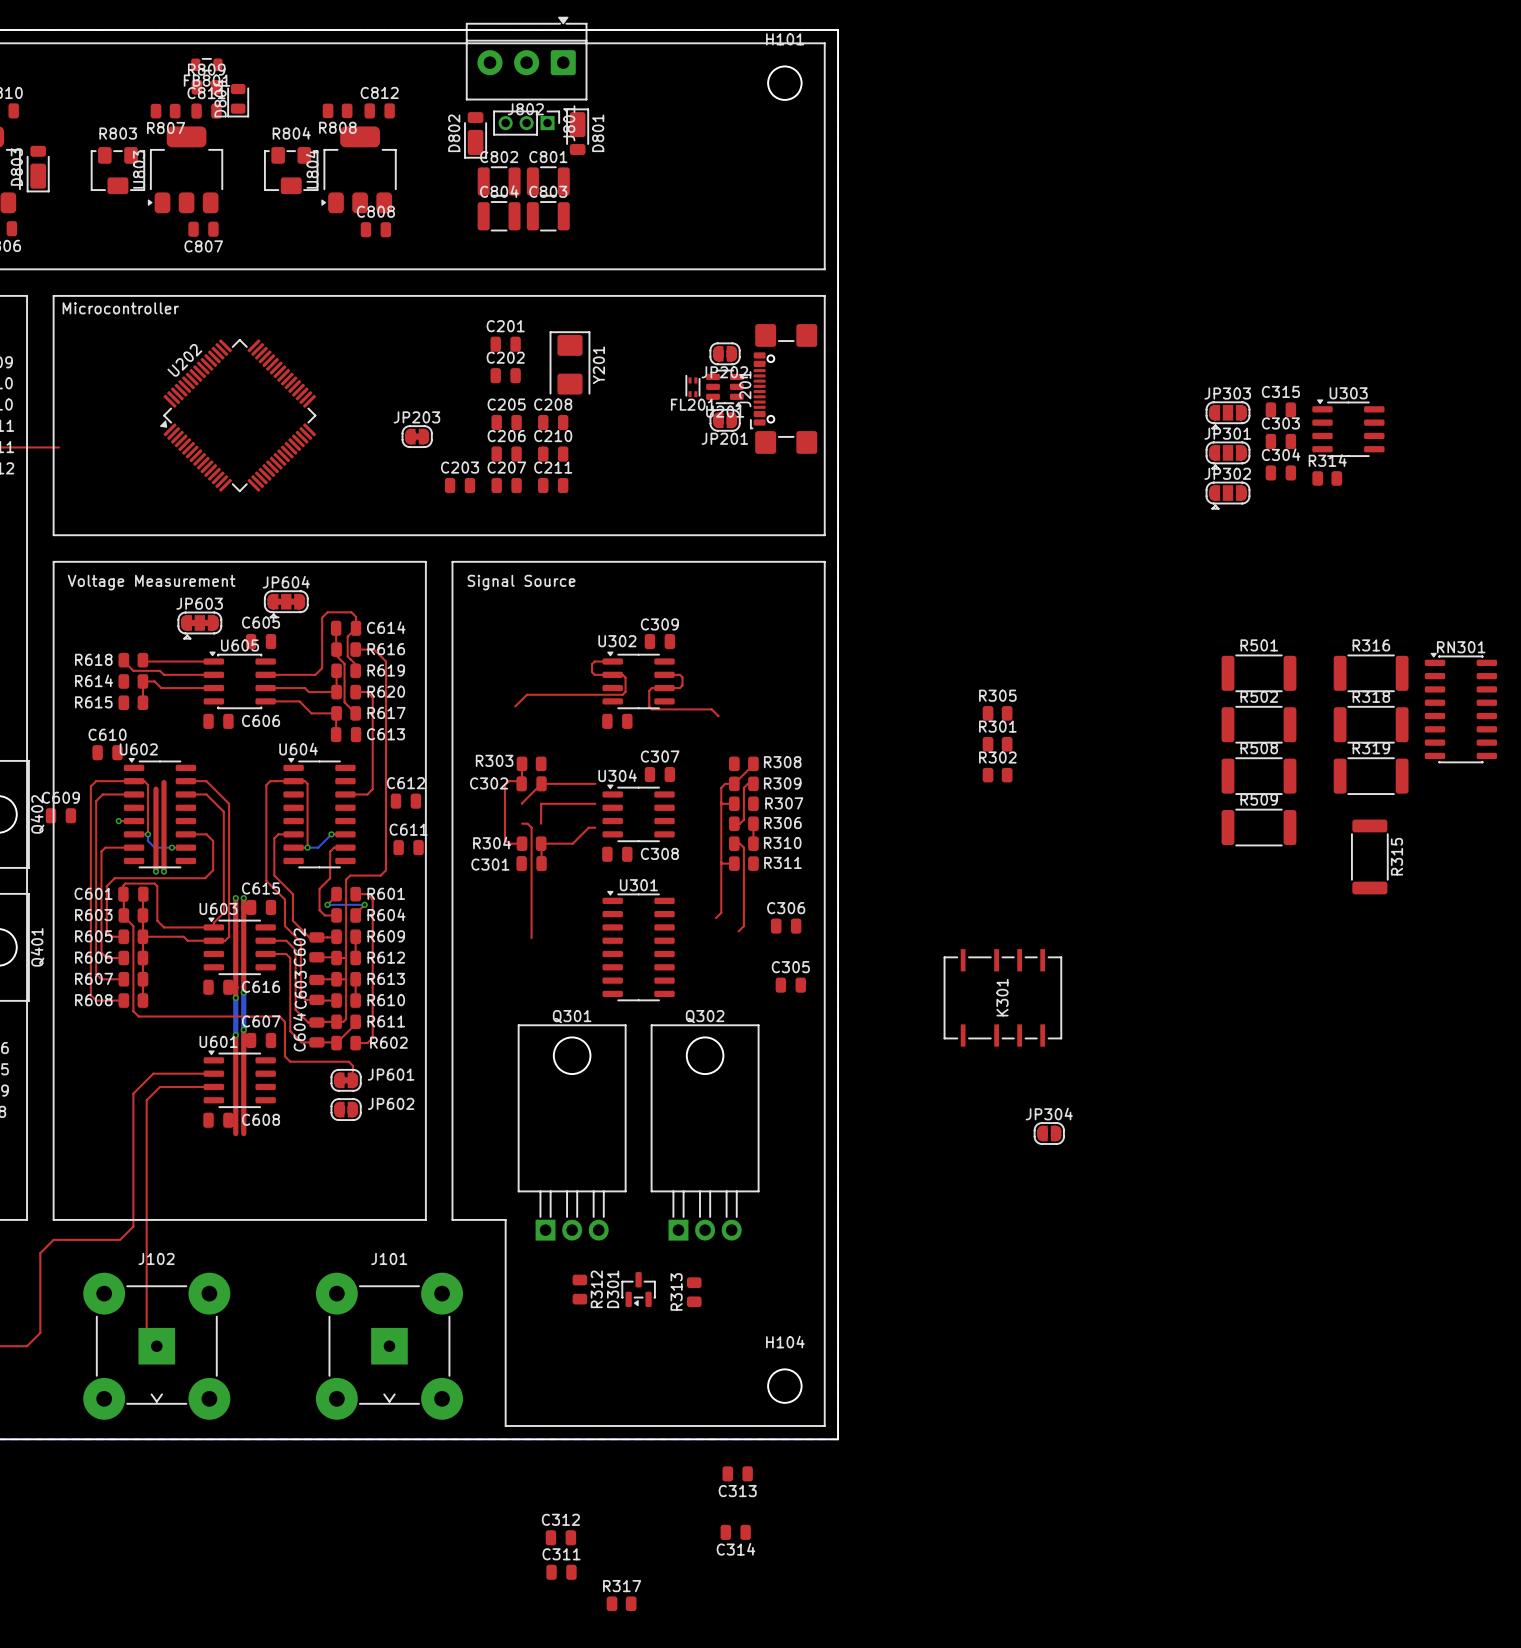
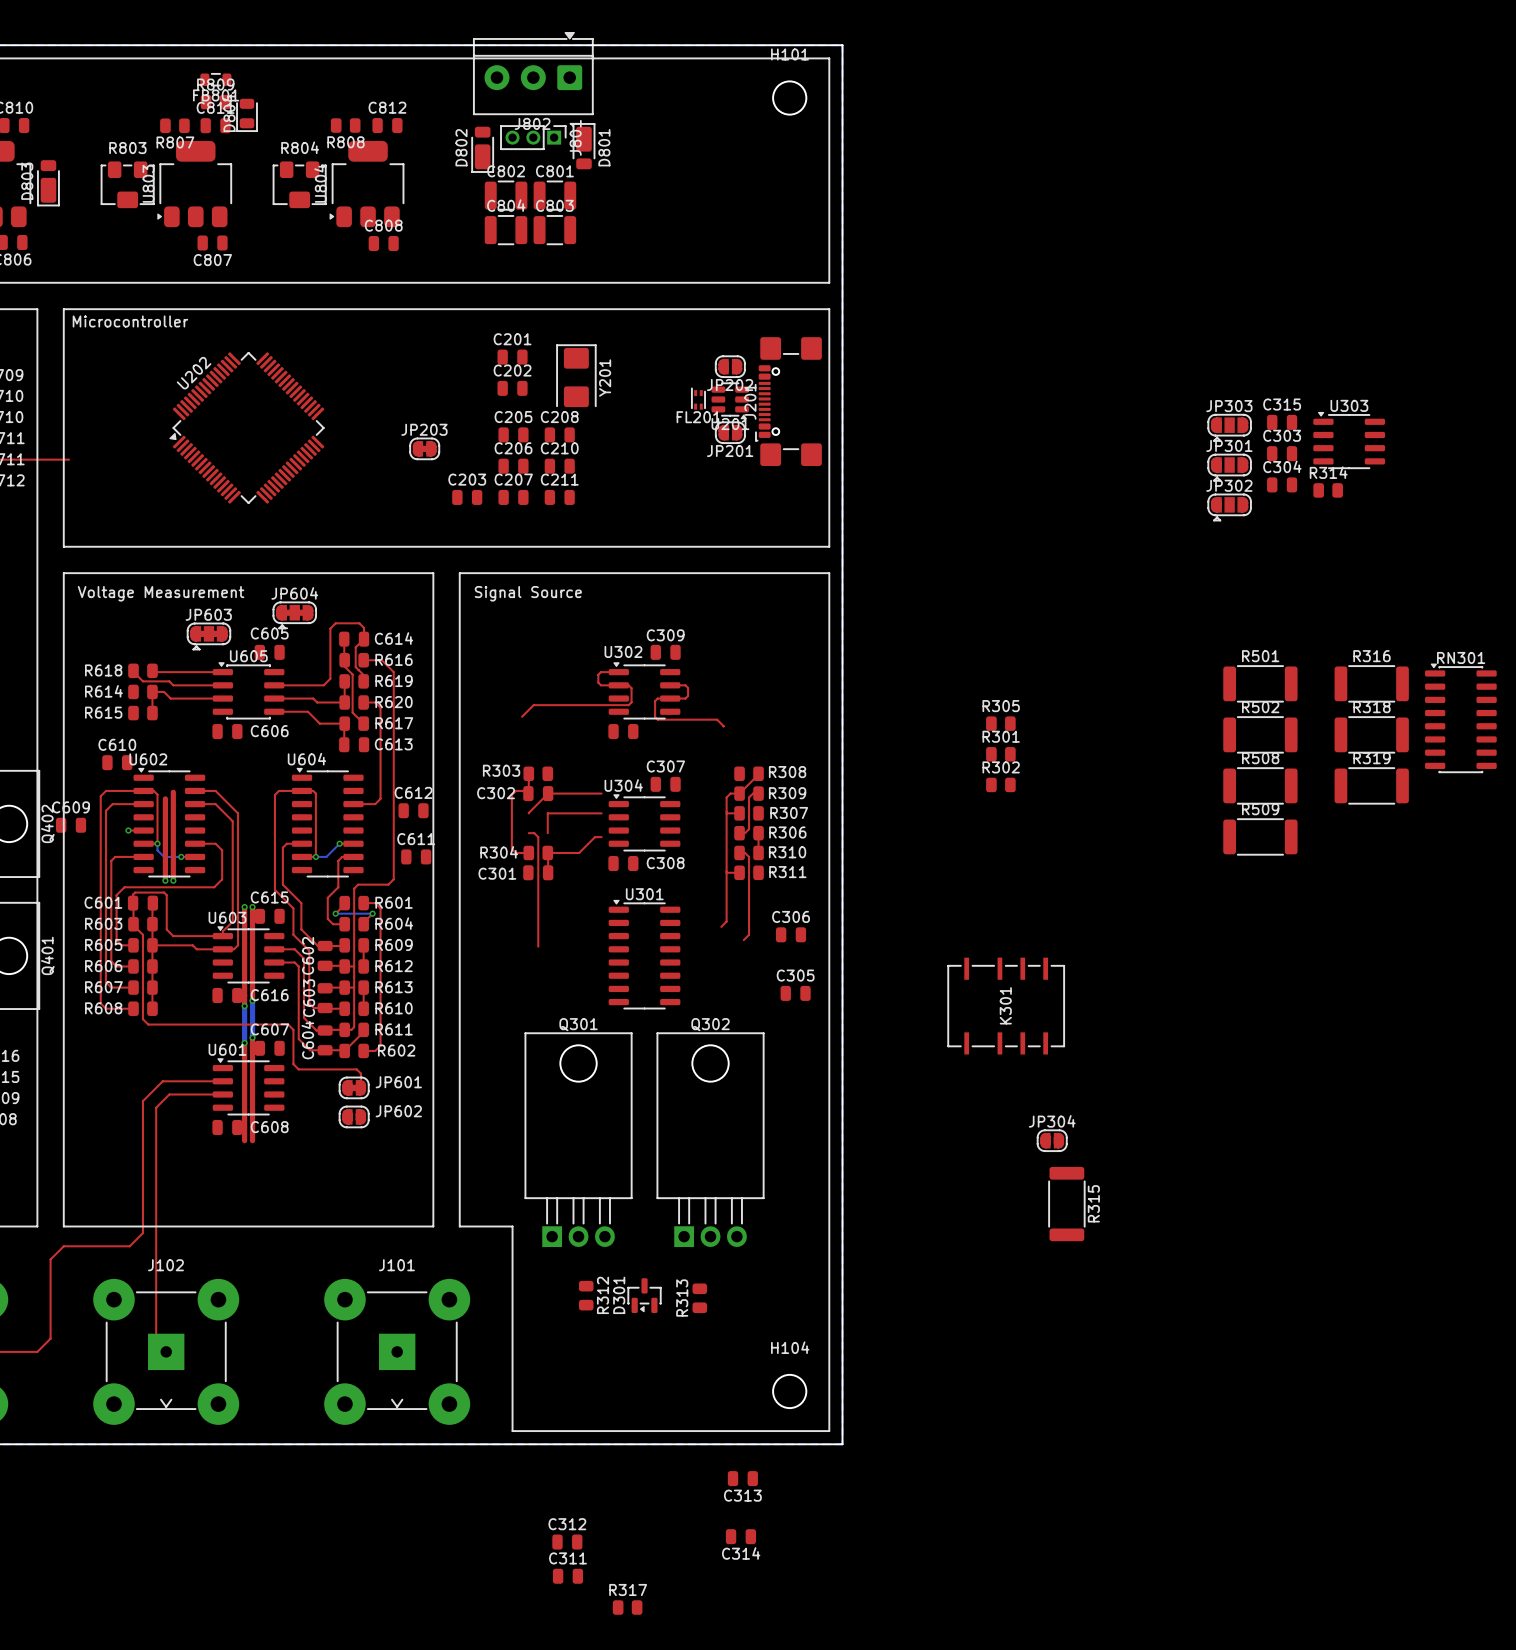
R315 position: (1369, 856) -> (1066, 1204)

